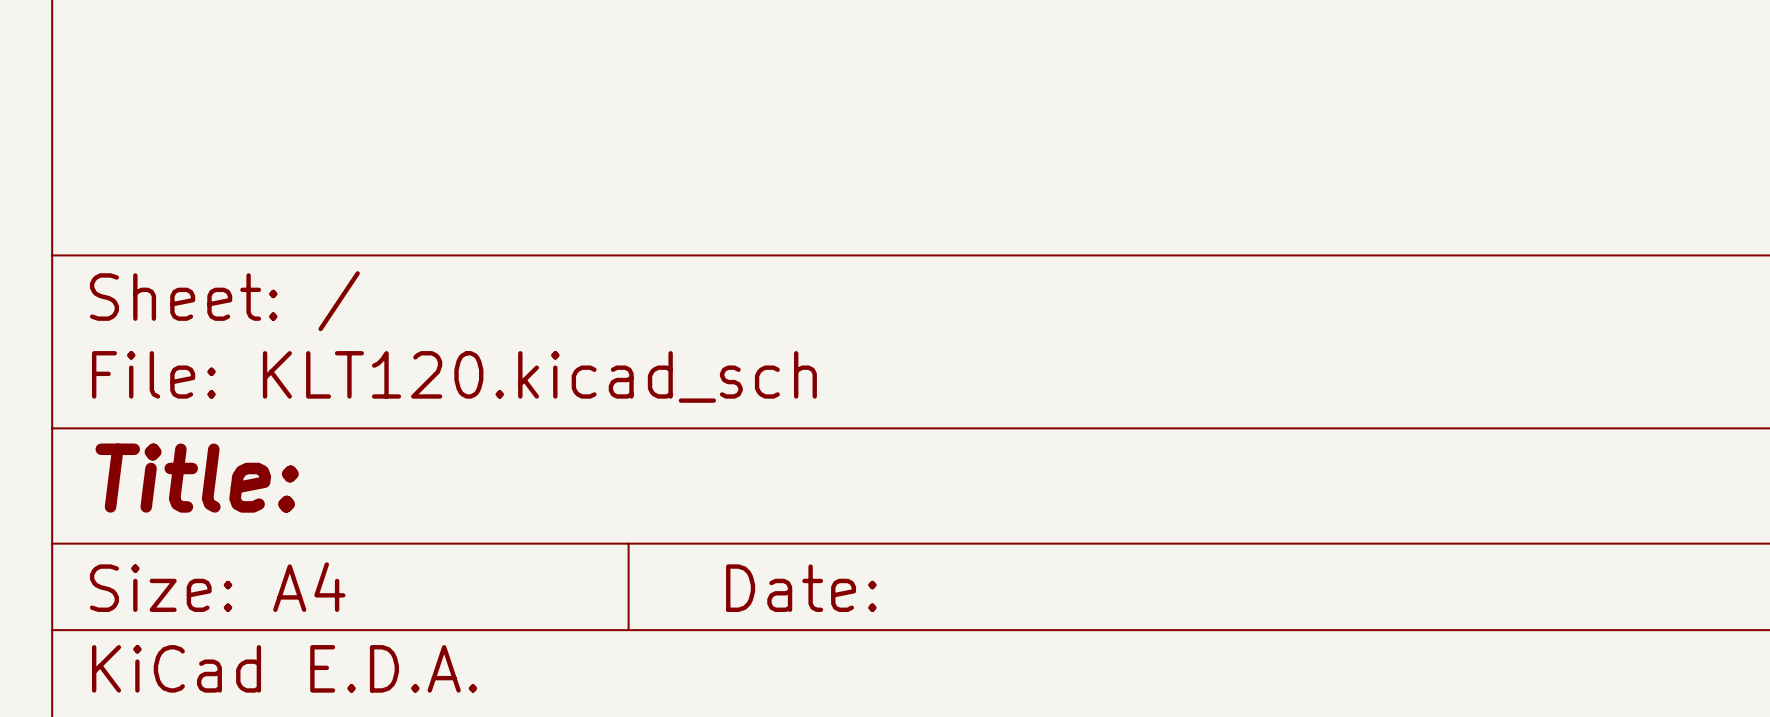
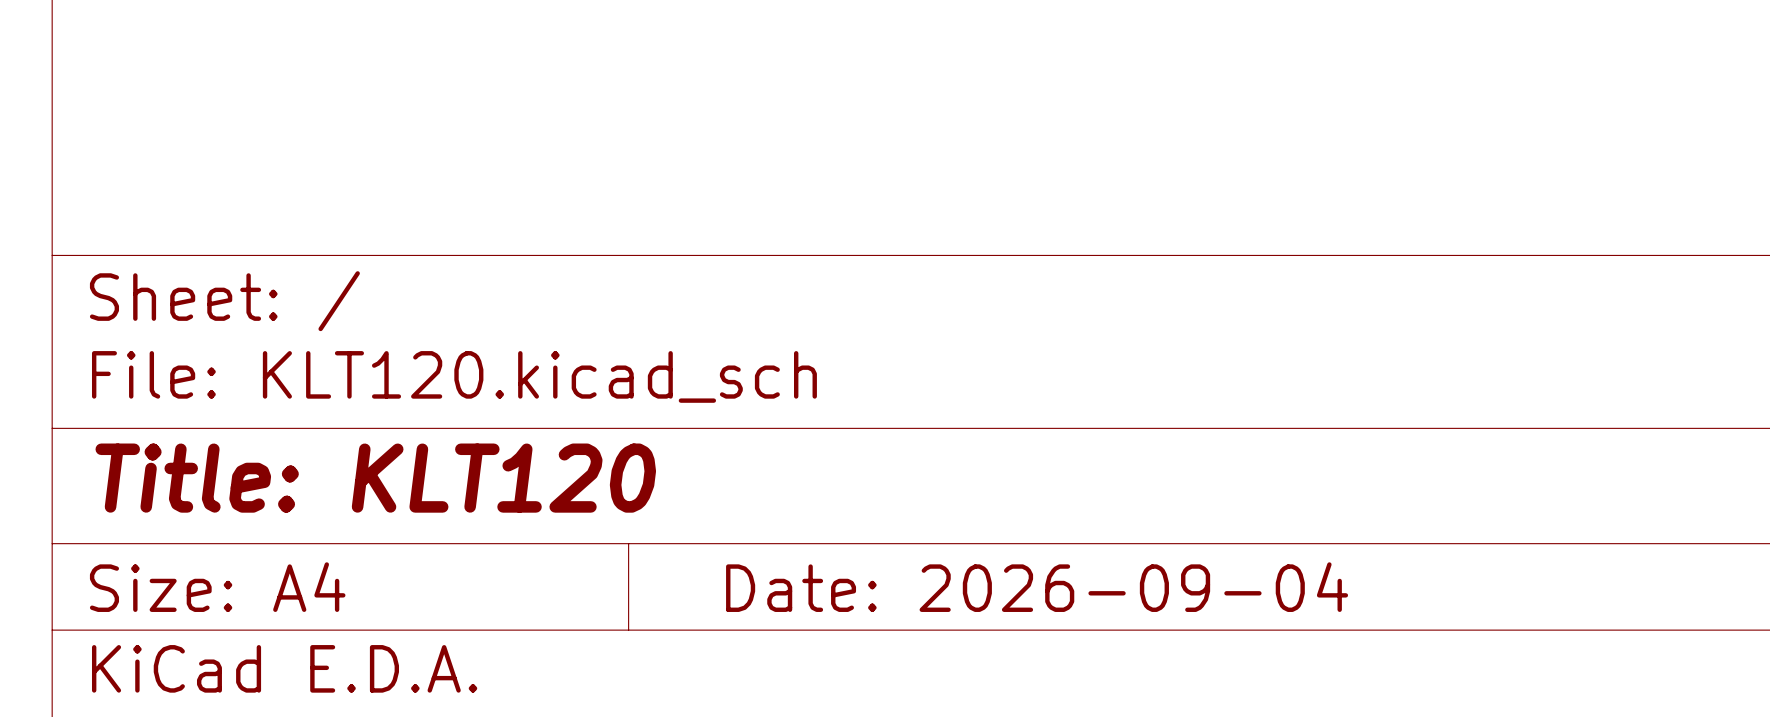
title block: Title: (197, 478) -> Title: KLT120 (375, 478)
title block: Date: (801, 588) -> Date: 2026-09-04 (1037, 587)

